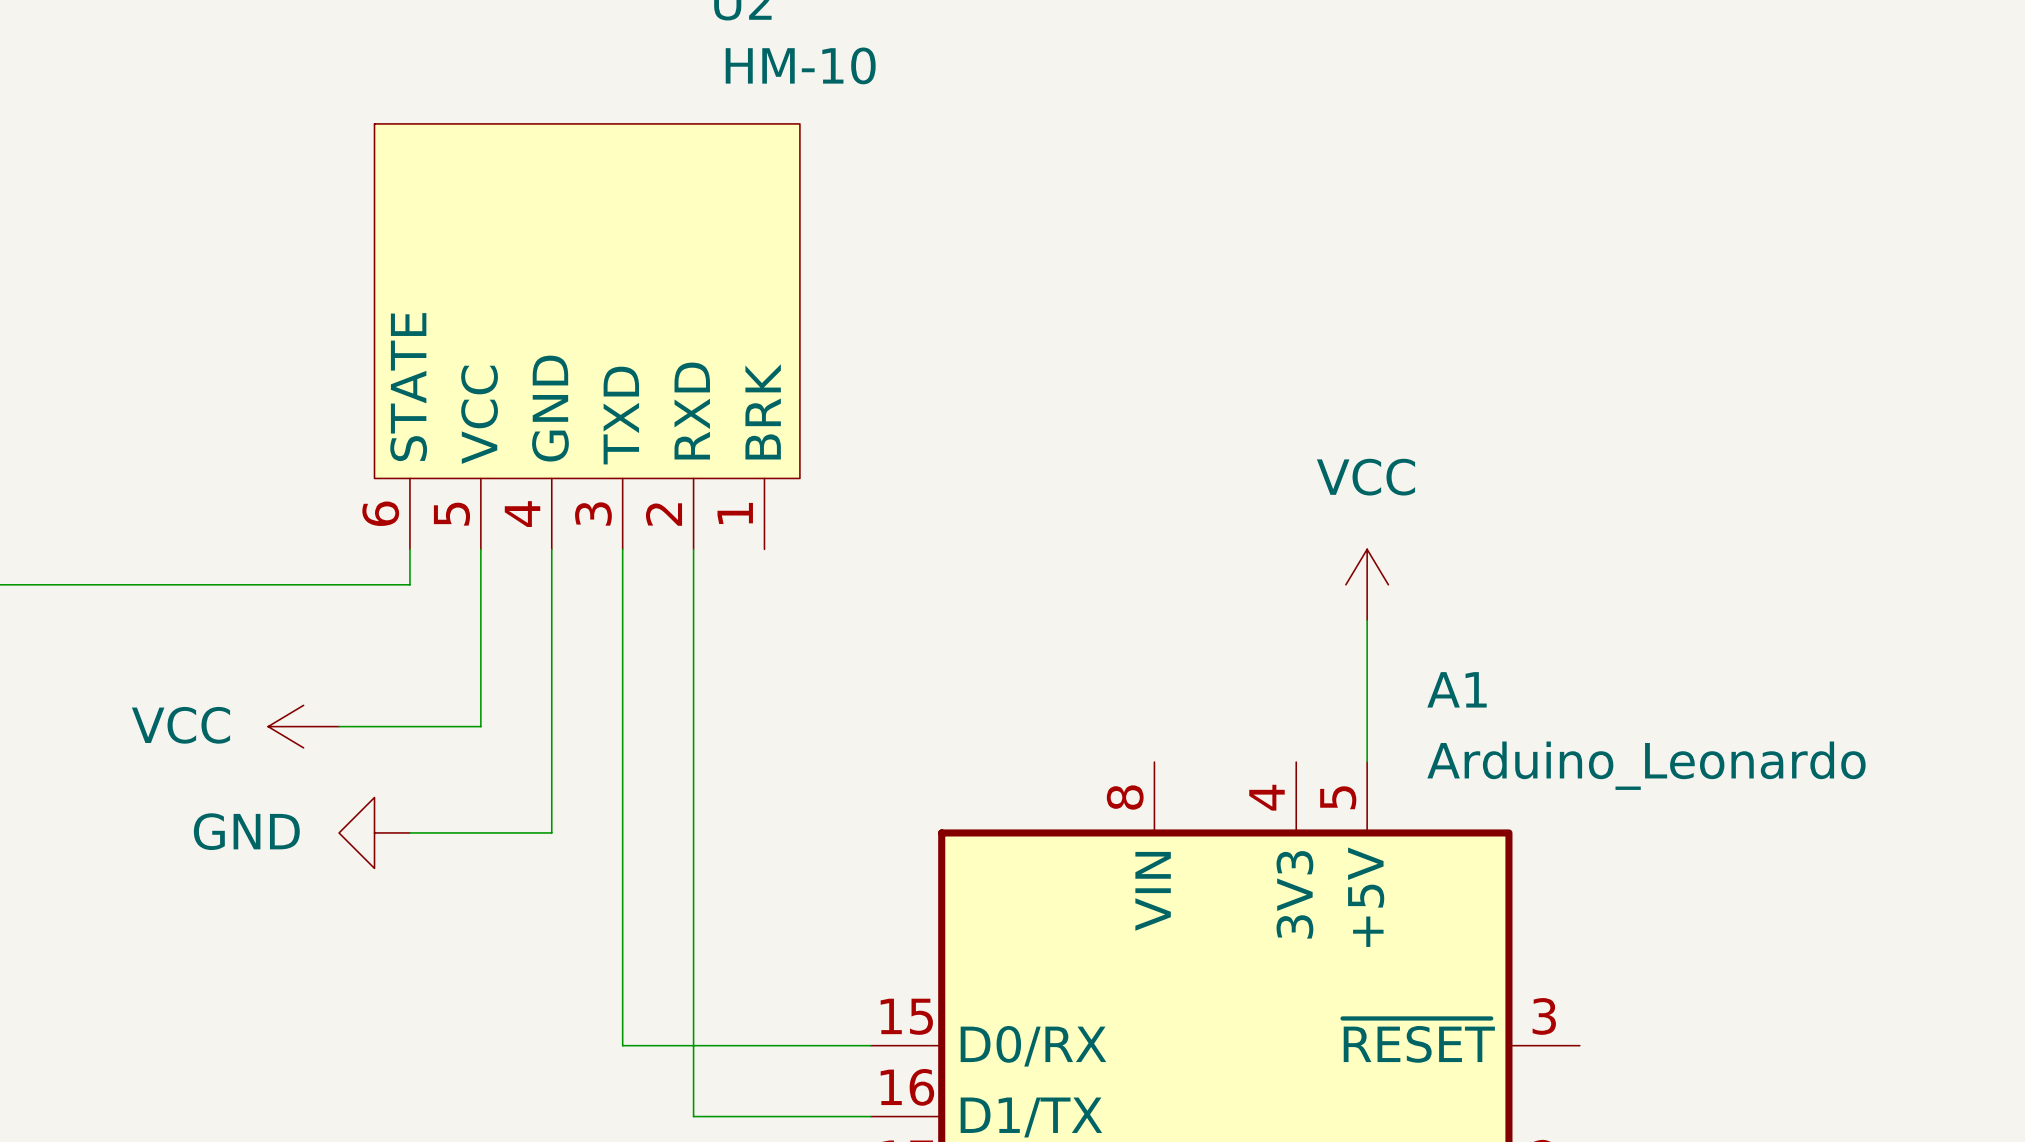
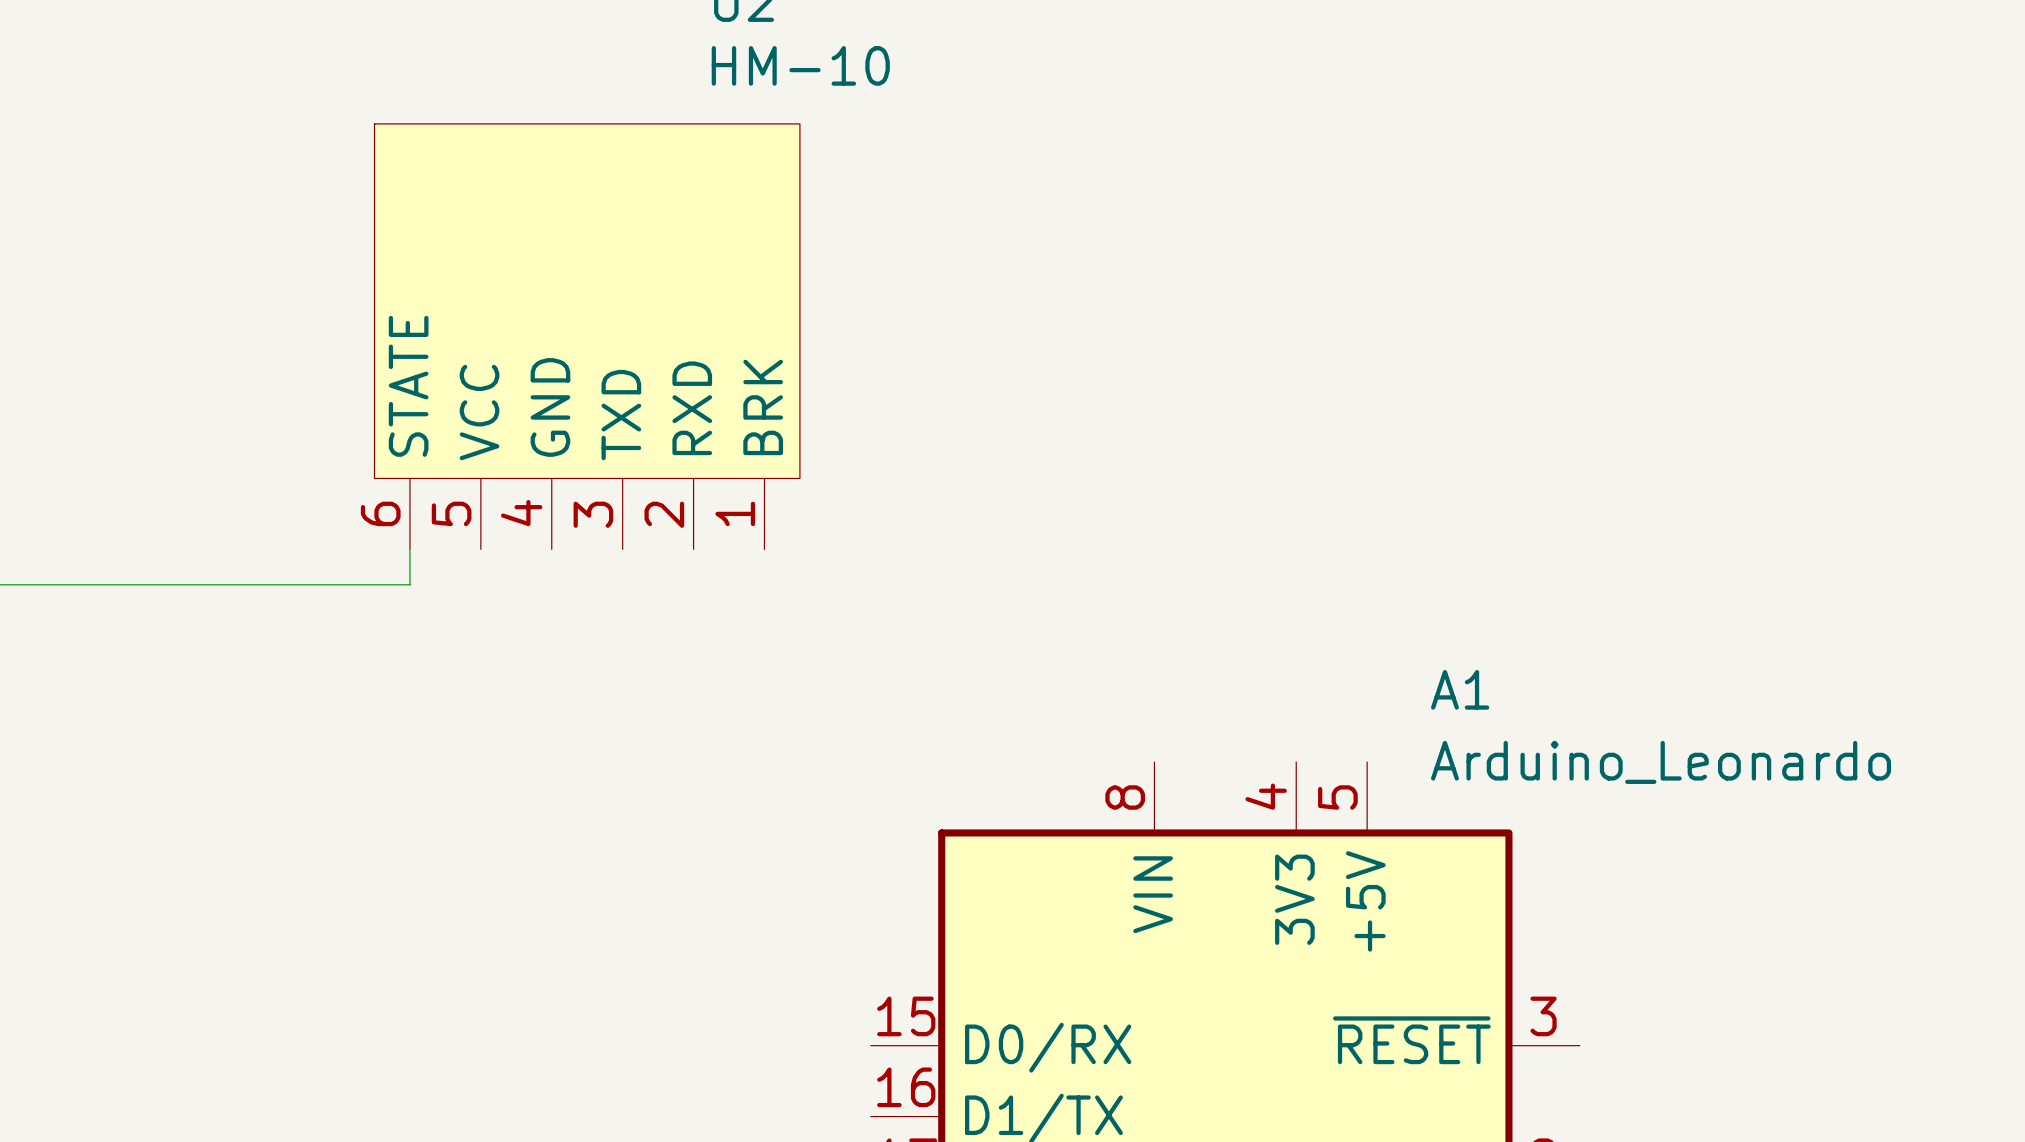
wire: (480, 549) (480, 726) (339, 726) -> none
wire: (551, 549) (551, 832) (409, 832) -> none
wire: (622, 549) (622, 1045) (870, 1045) -> none
wire: (693, 549) (693, 1116) (870, 1116) -> none
power symbol: VCC (1367, 584) -> none
wire: (1367, 620) (1367, 762) -> none
power symbol: VCC (303, 726) -> none
power symbol: GND (374, 832) -> none

